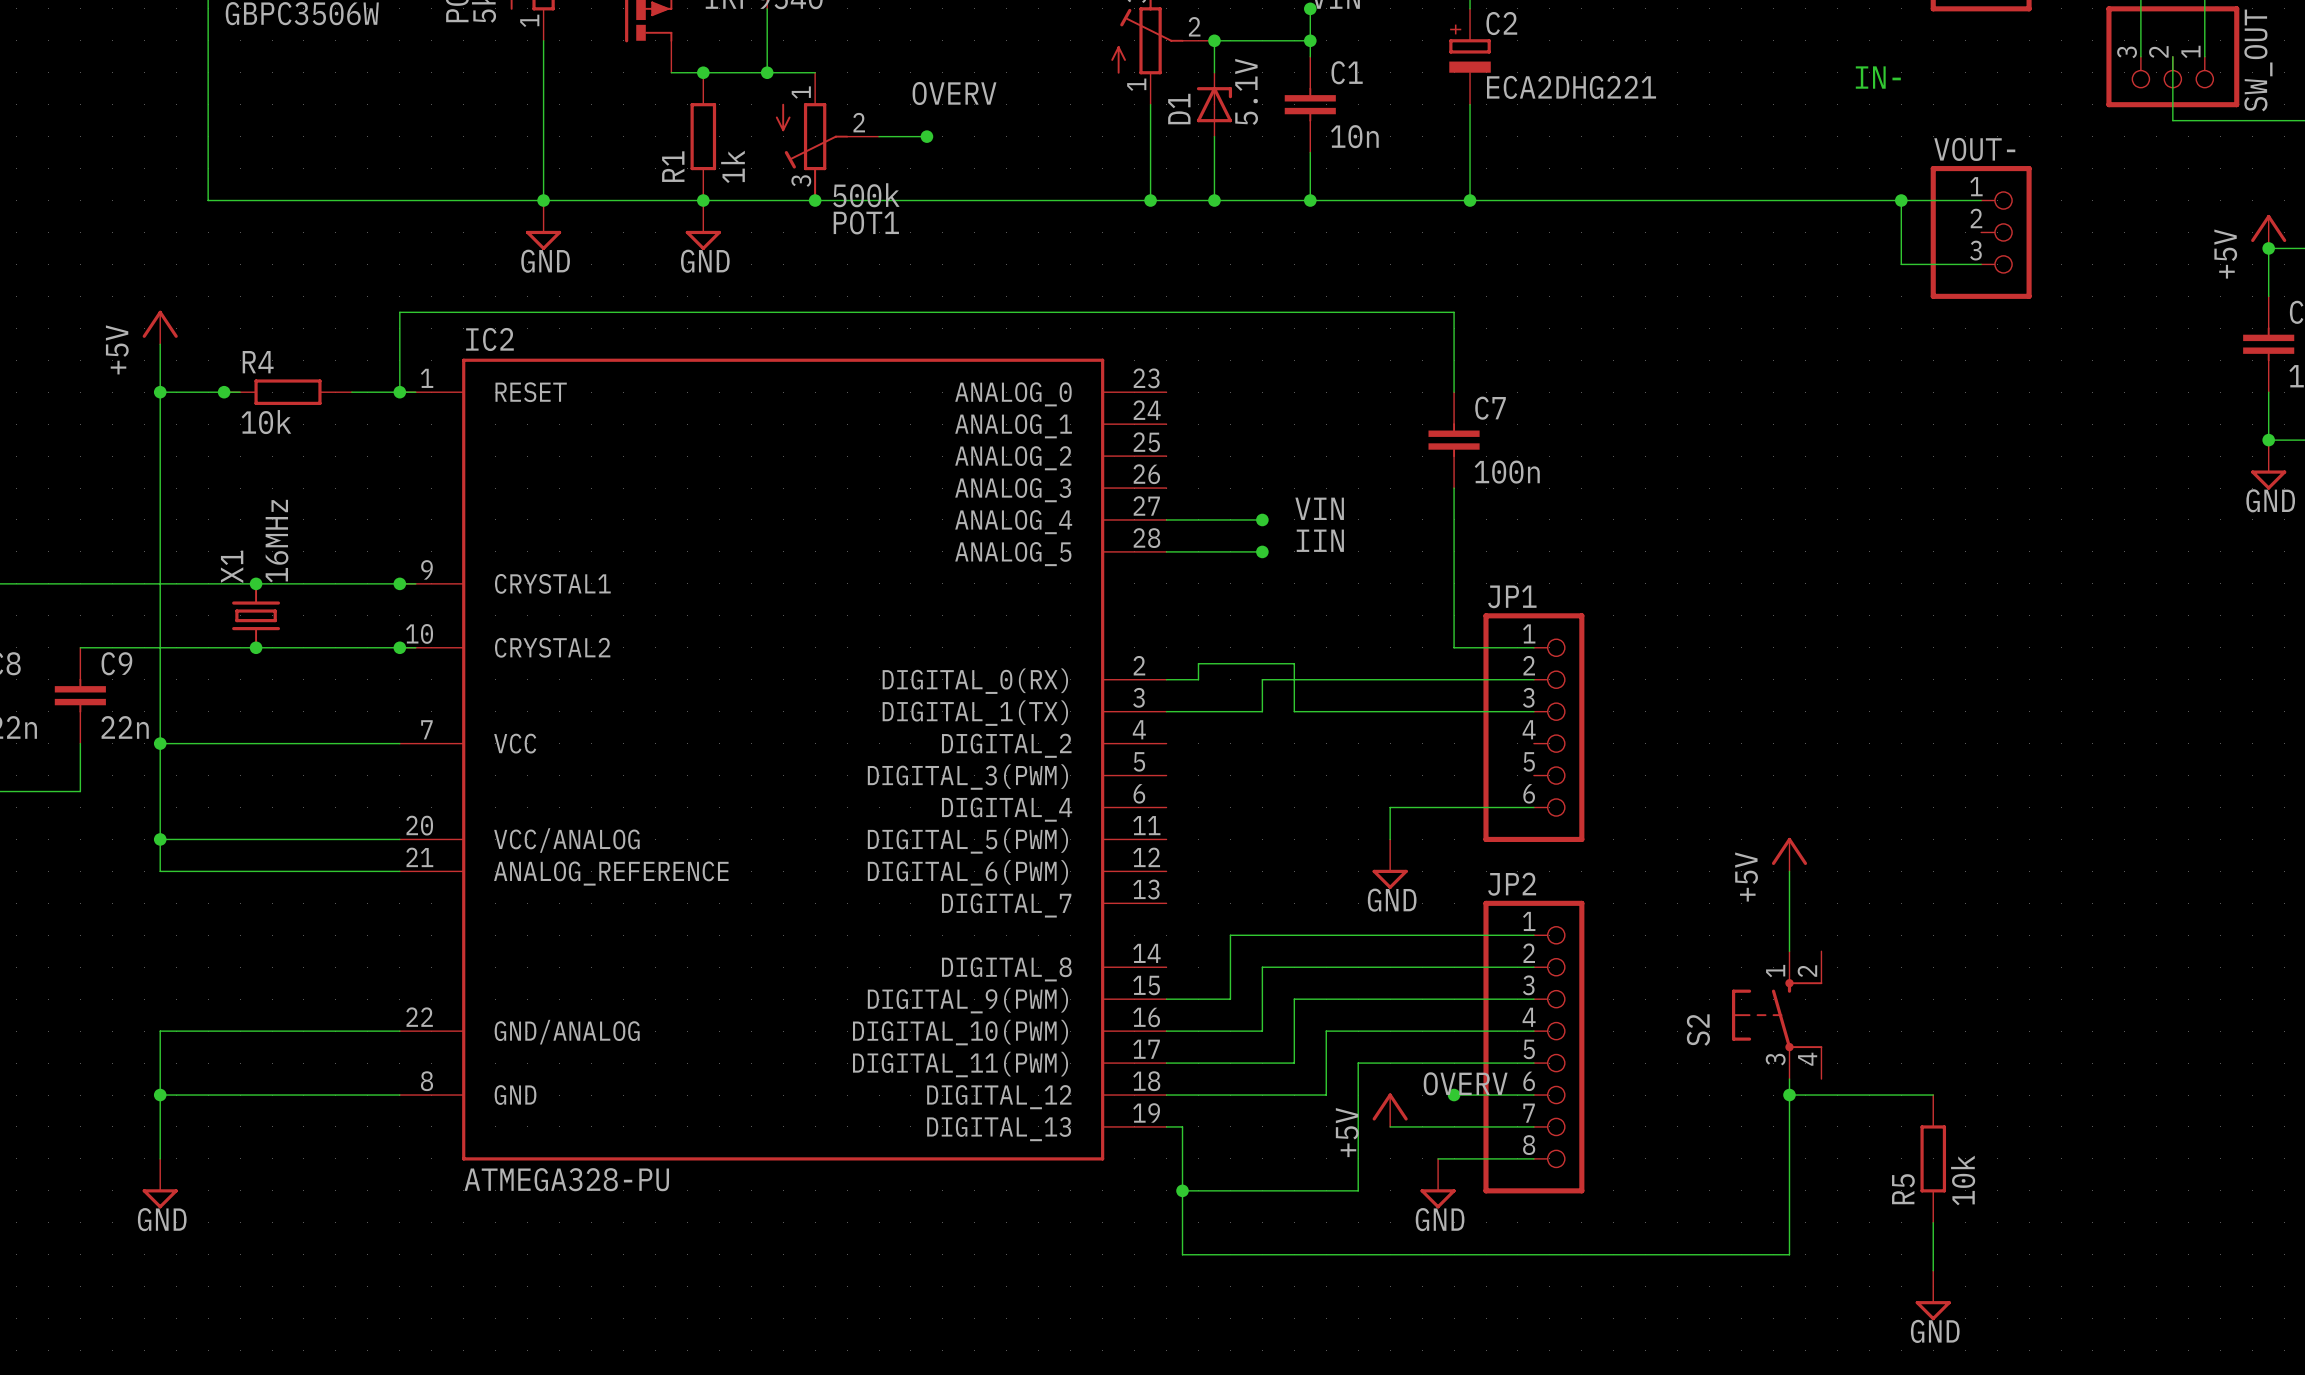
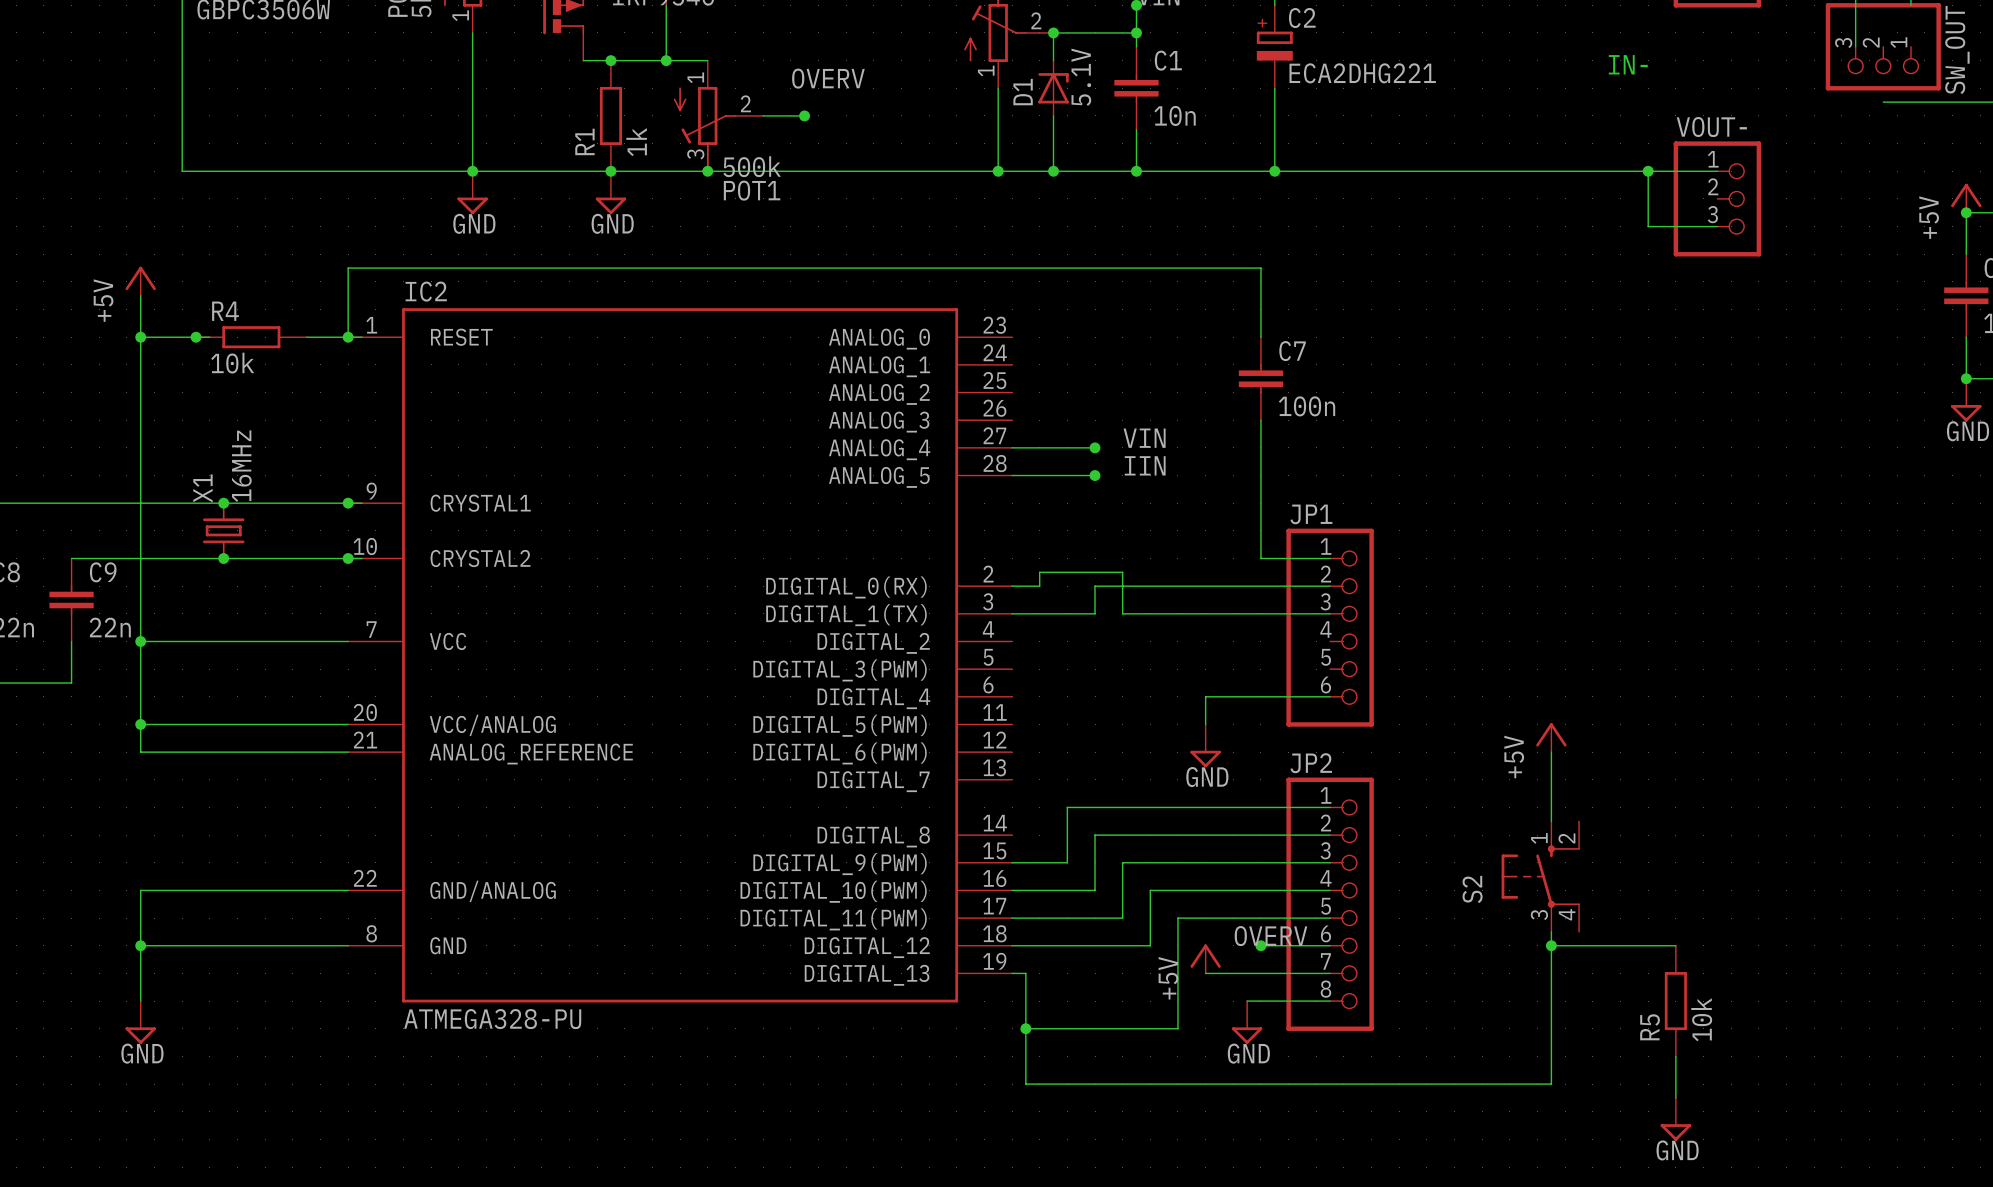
wire: (2204, 8) (2204, 56) -> none
wire: (2172, 56) (2172, 120) -> none

